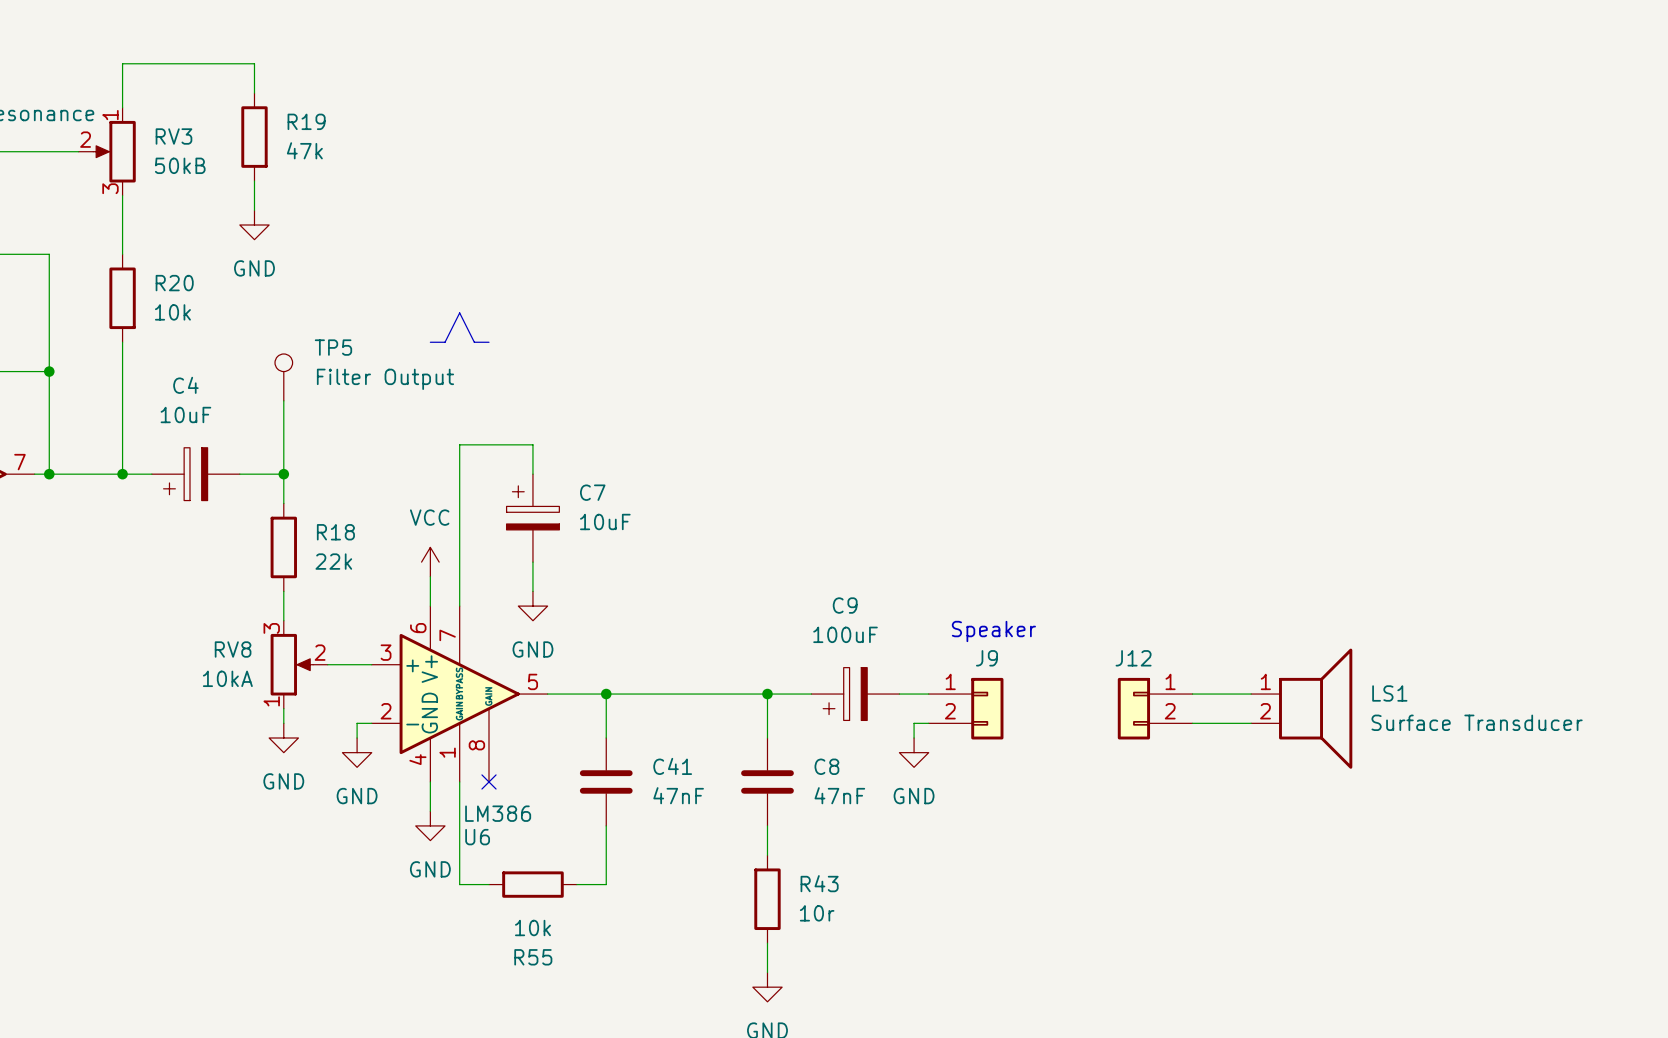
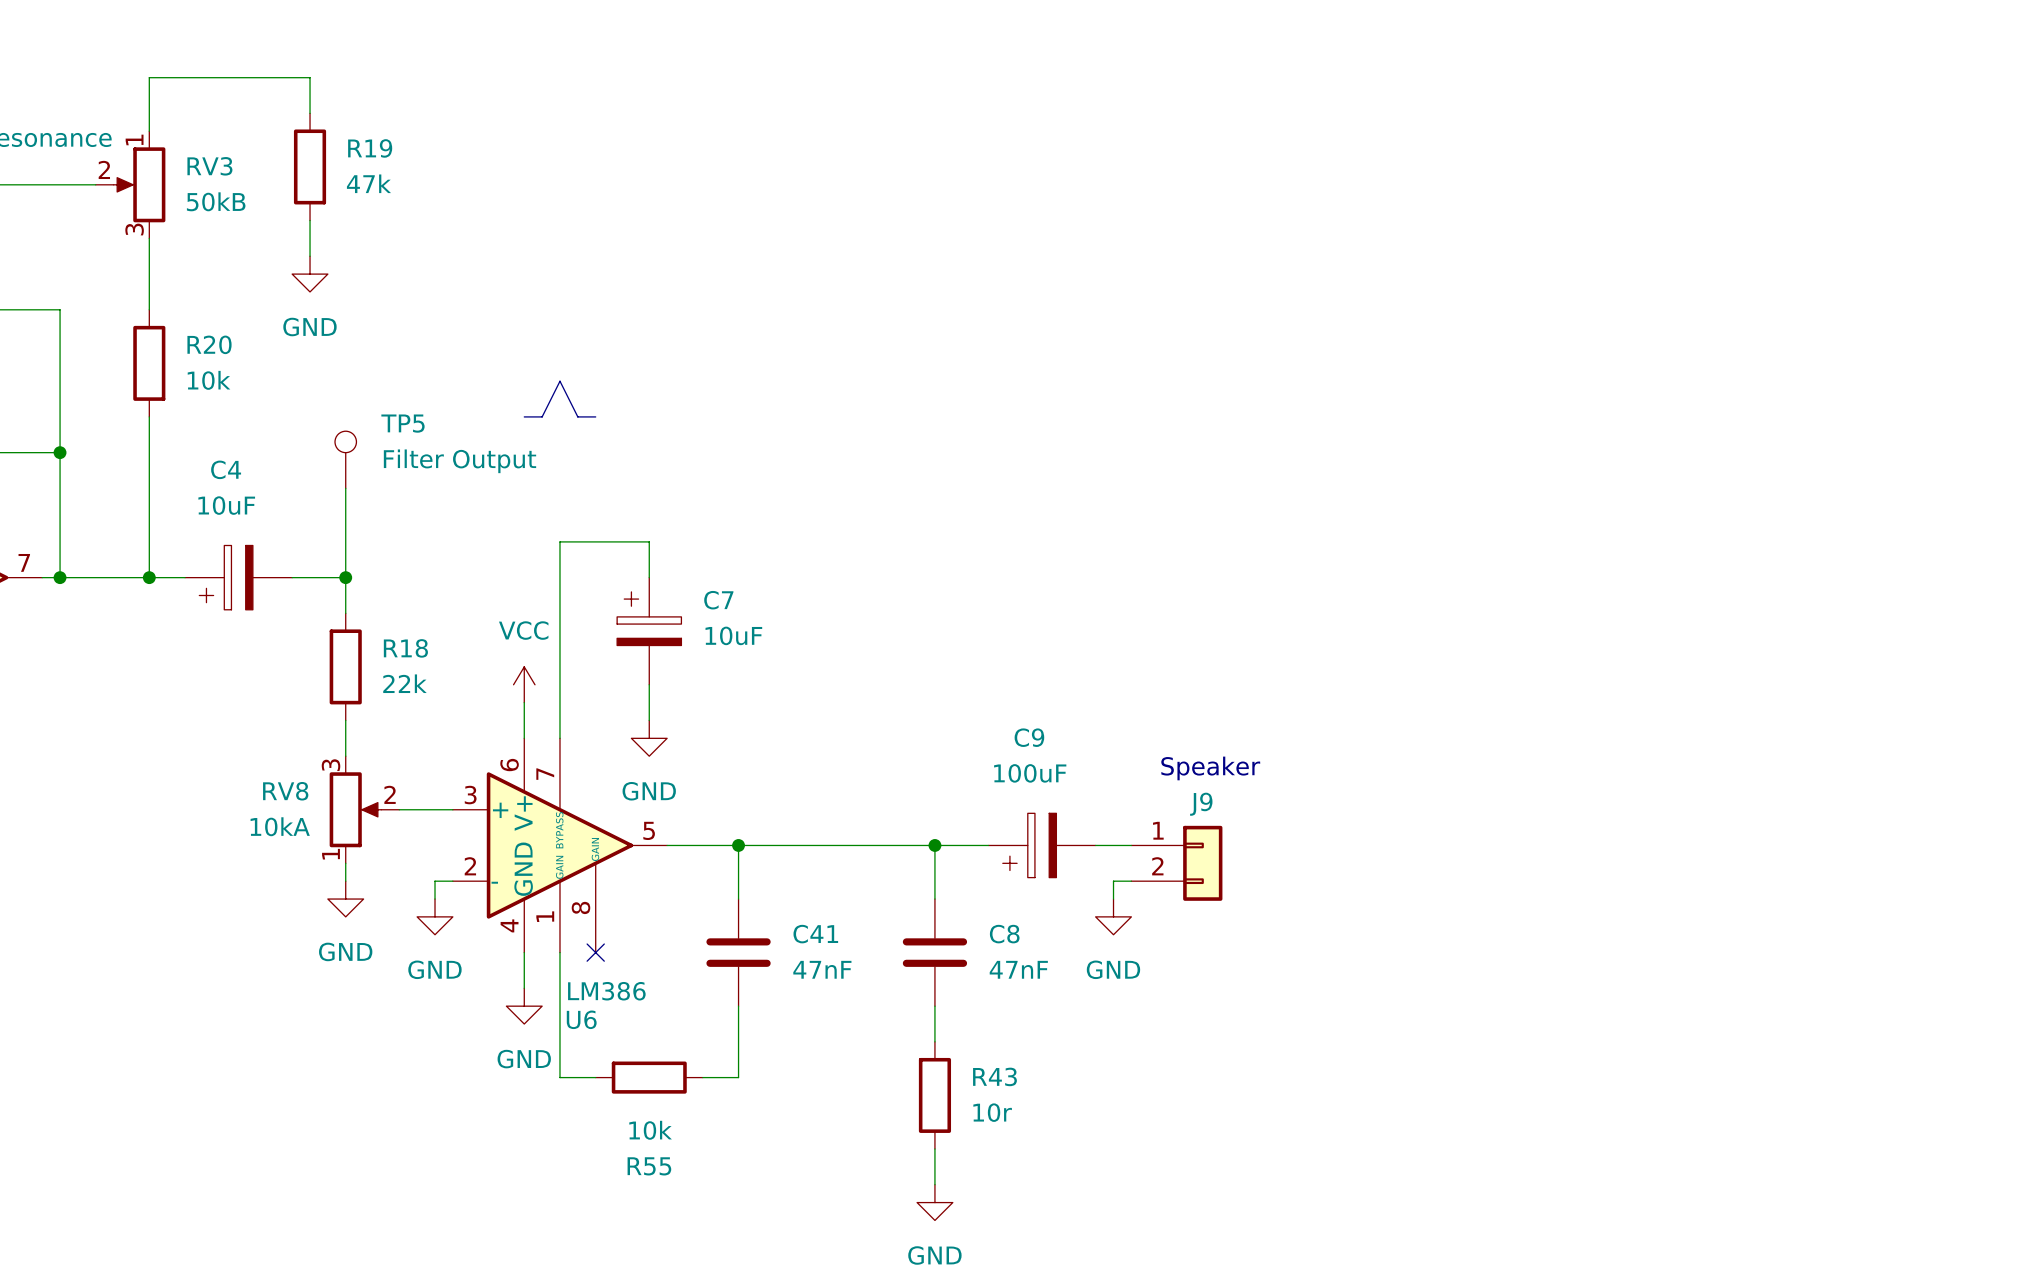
wire: (1192, 694) (1251, 694) -> none
J12: (1155, 708) -> none
LS1: Surface Transducer (1301, 708) -> none
wire: (1192, 723) (1251, 723) -> none

